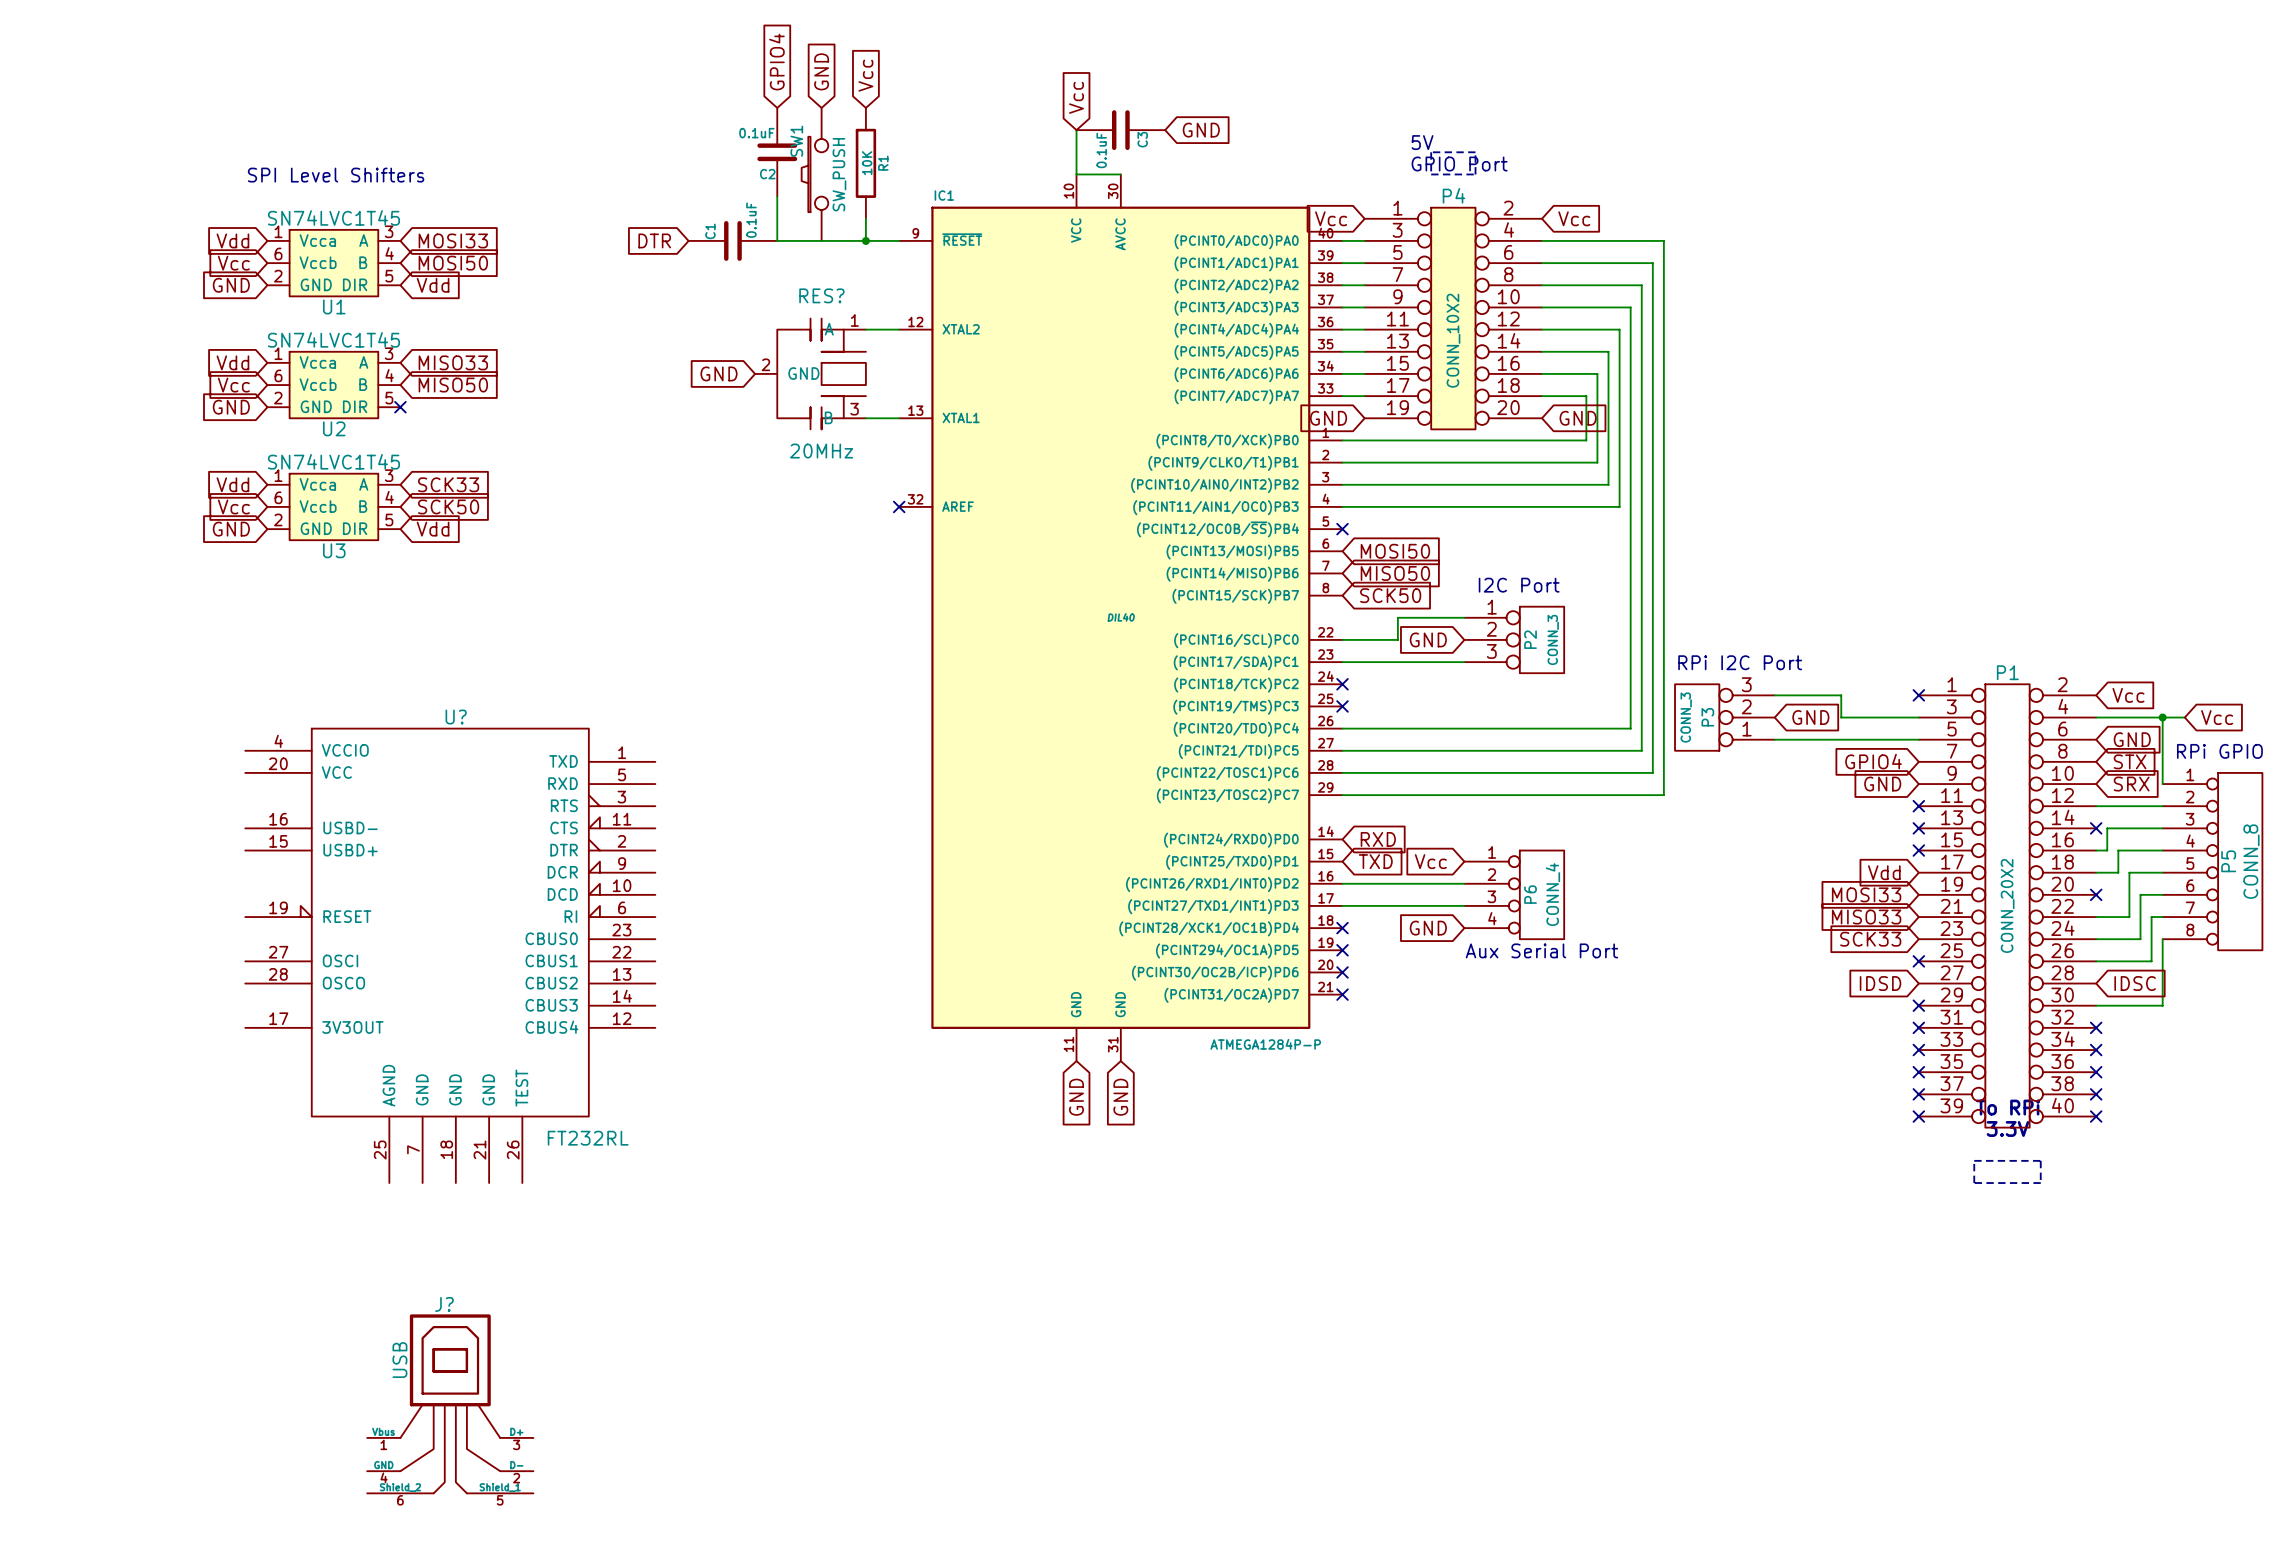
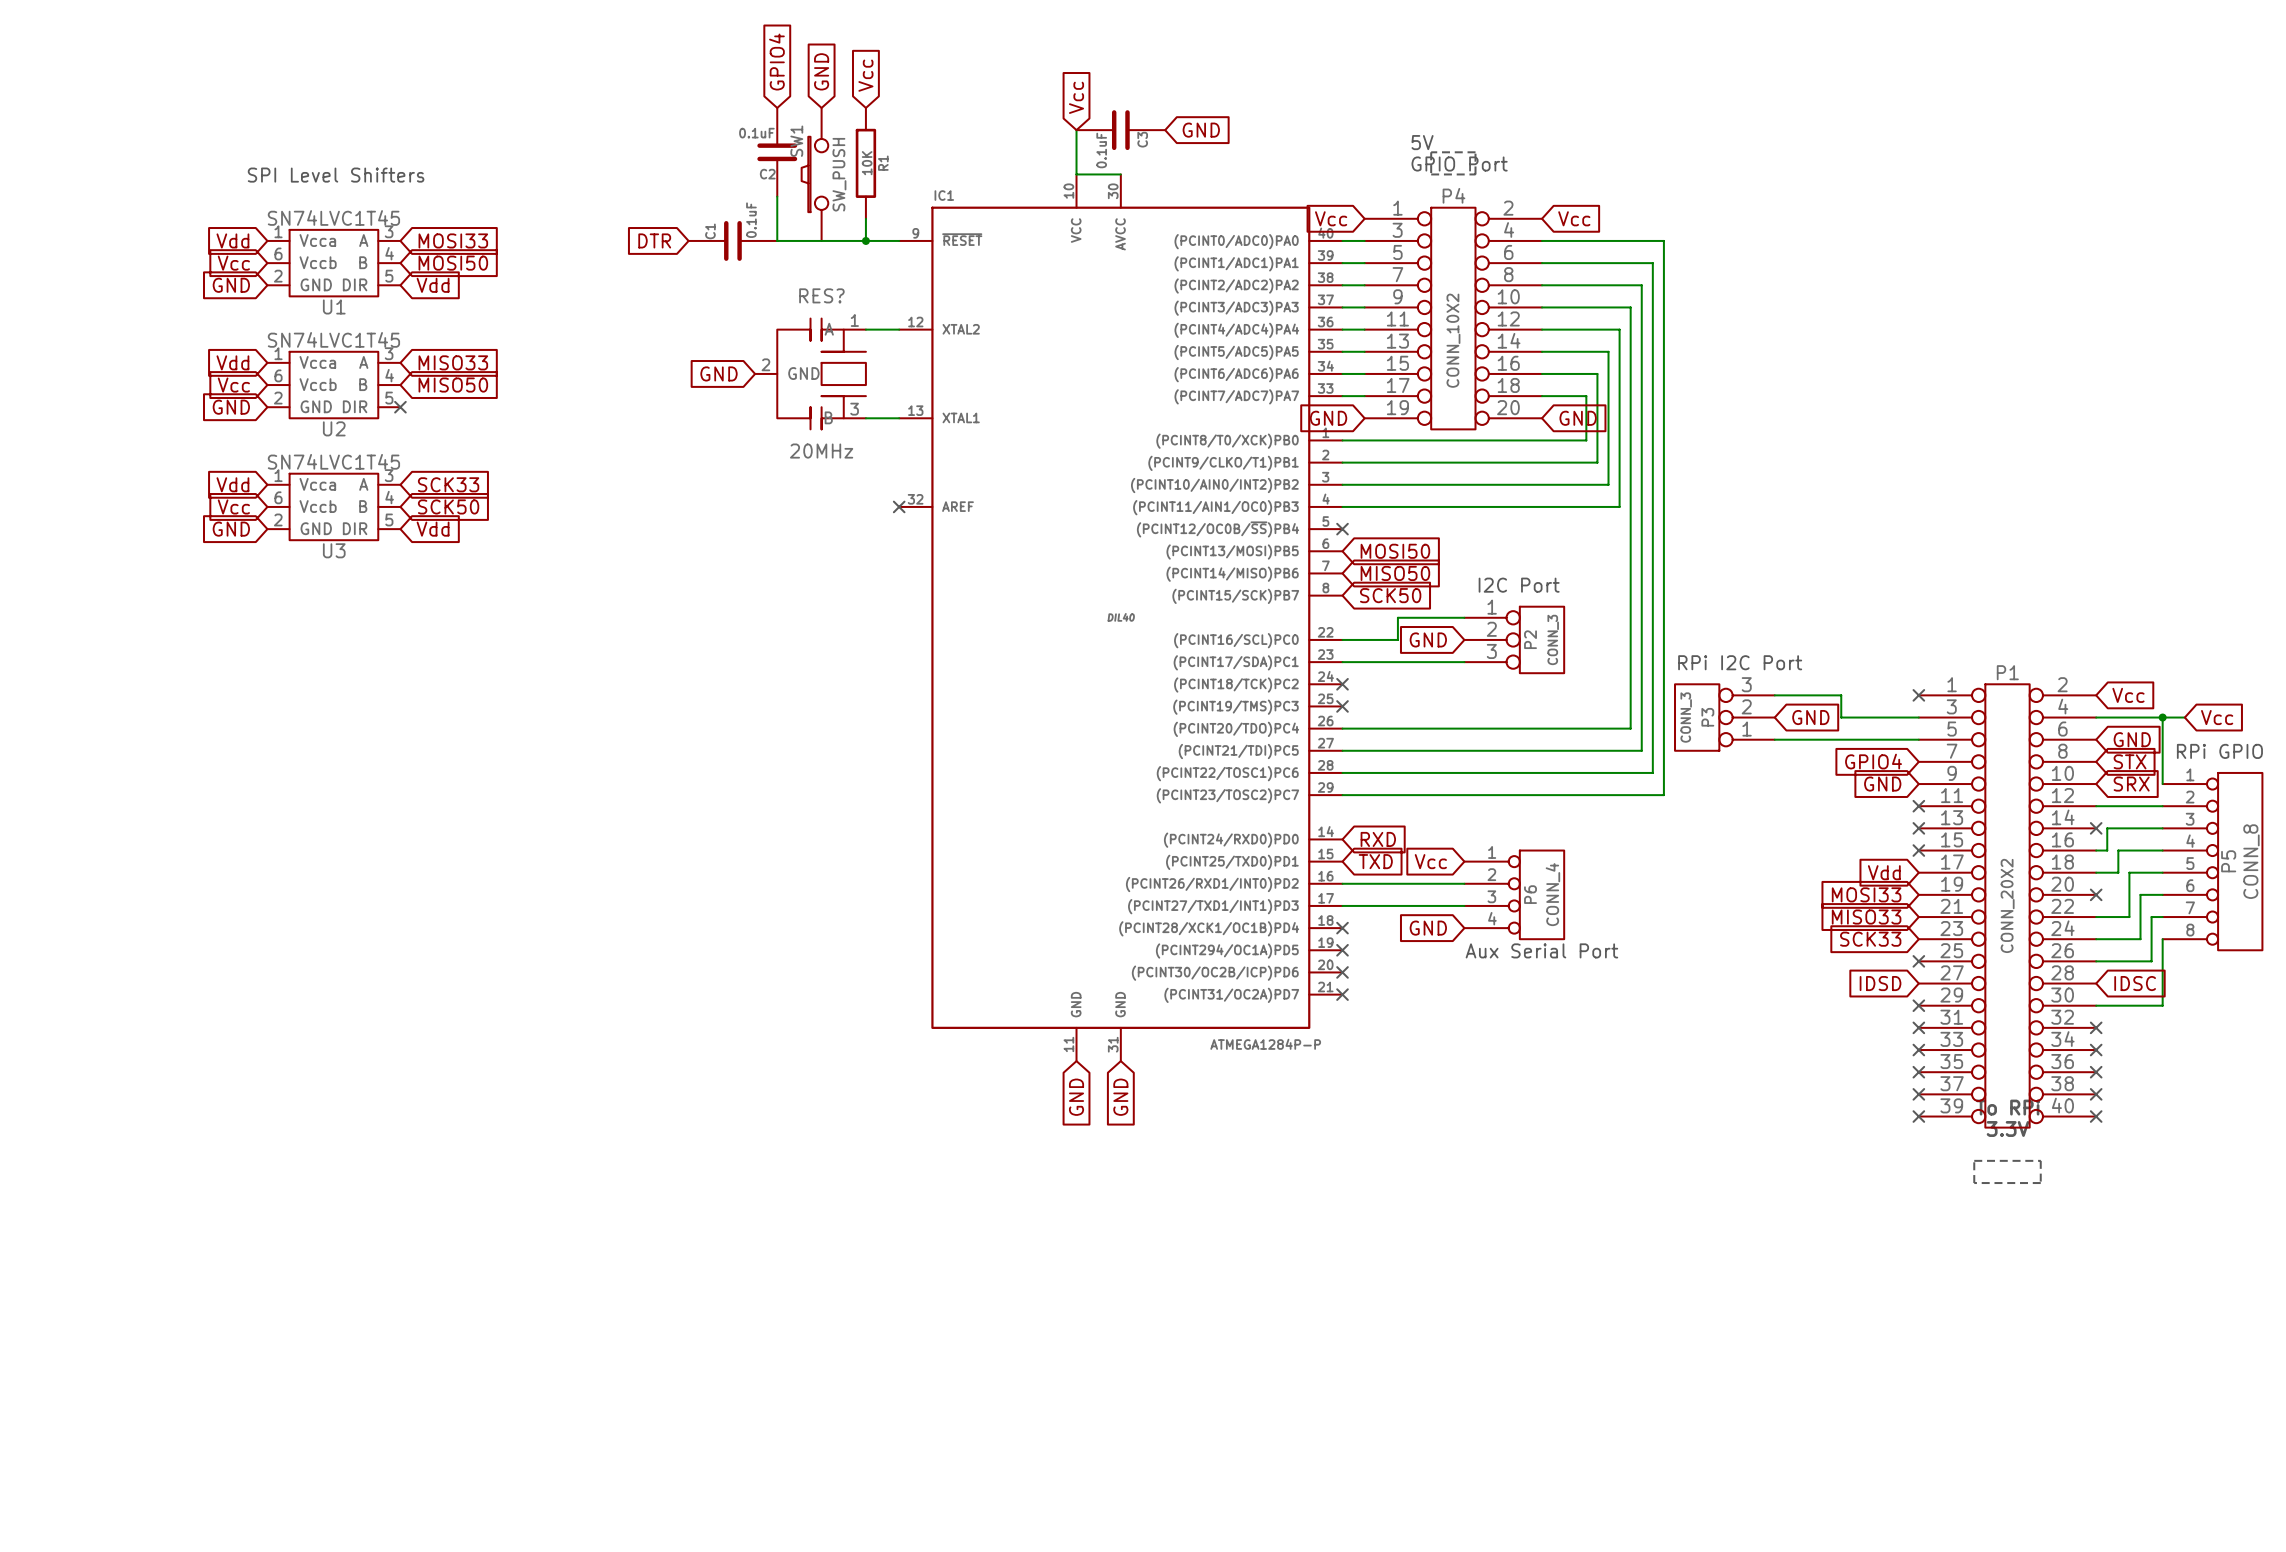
U?: FT232RL (450, 955) -> none
J?: USB (450, 1403) -> none

